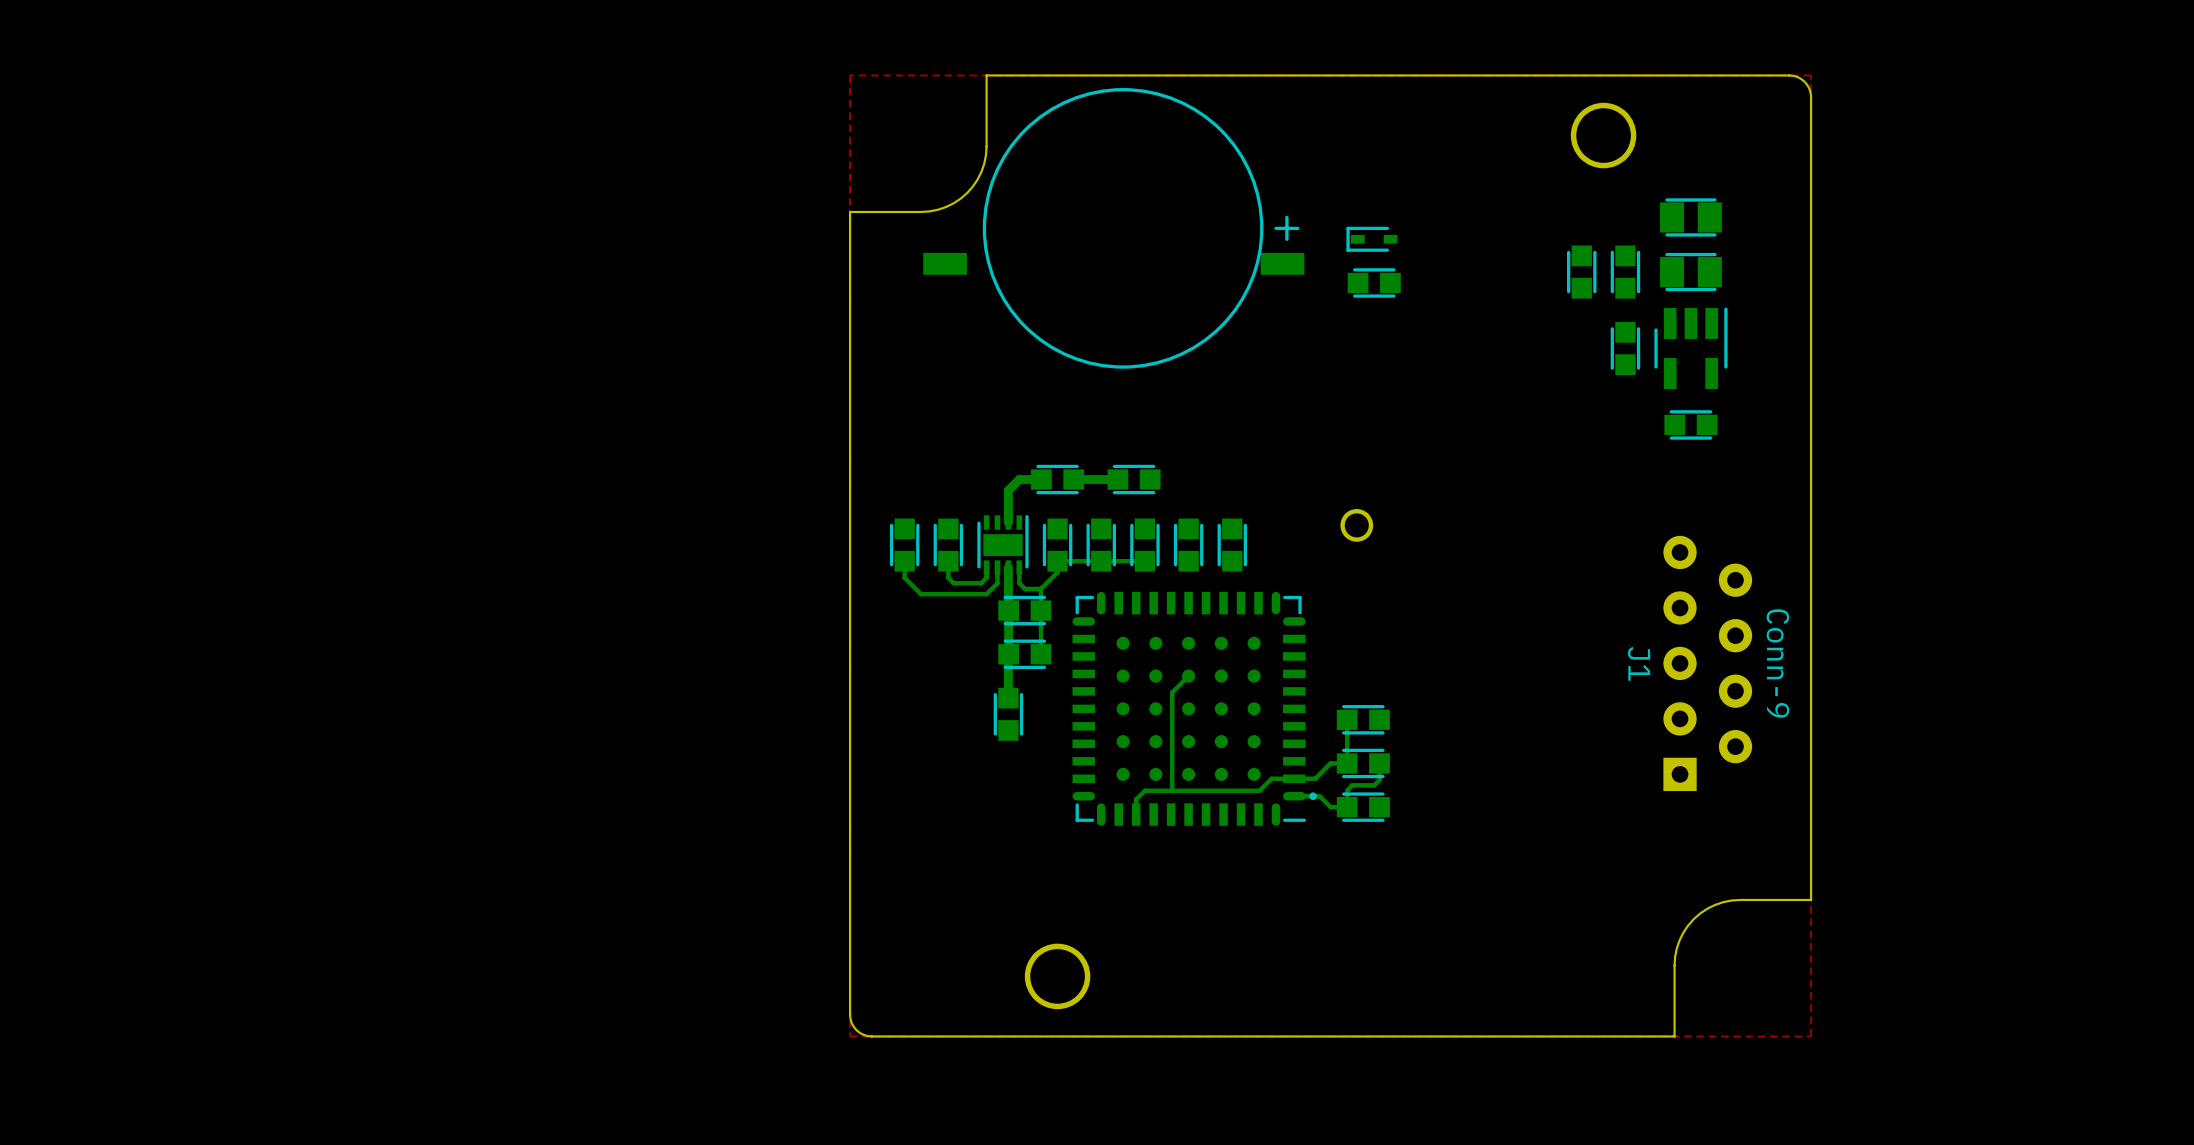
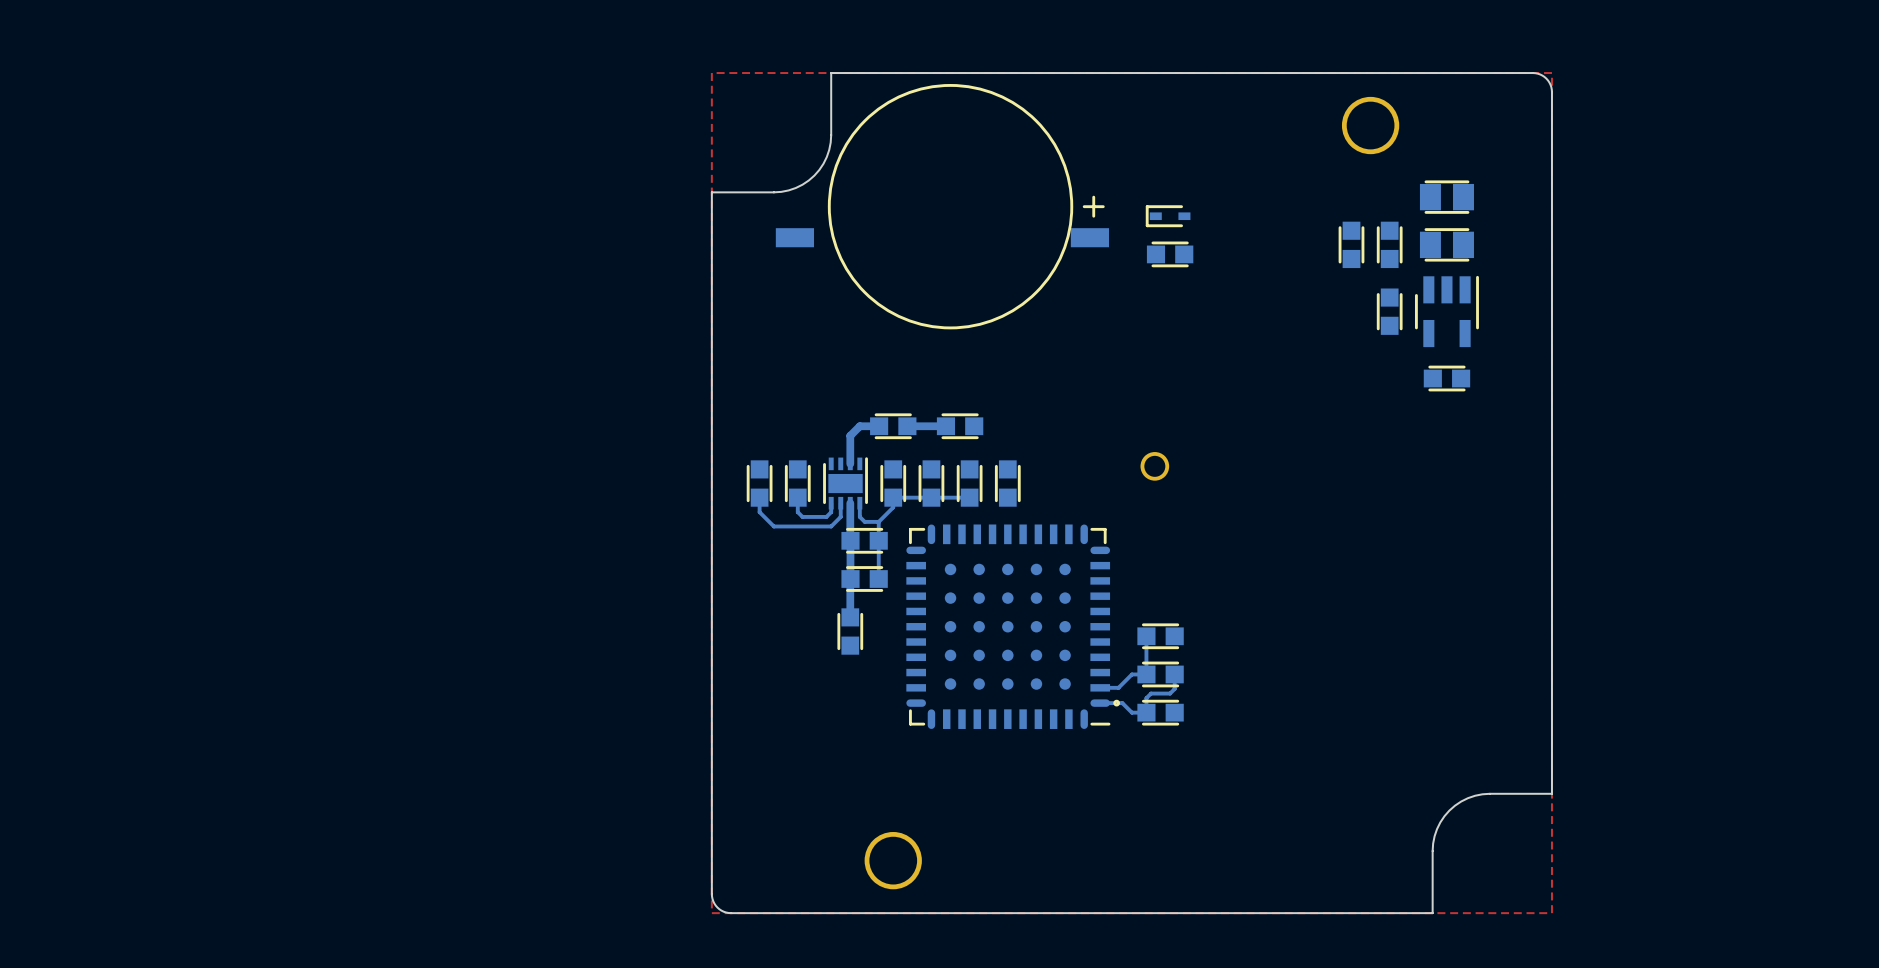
part: (1232, 545) -> none
J1: Conn-9 (1707, 663) -> none
bottom track: (1188, 676) (1172, 692) (1172, 790) -> none
bottom track: (1294, 778) (1271, 778) (1259, 790) (1144, 790) (1136, 799) (1136, 814) -> none

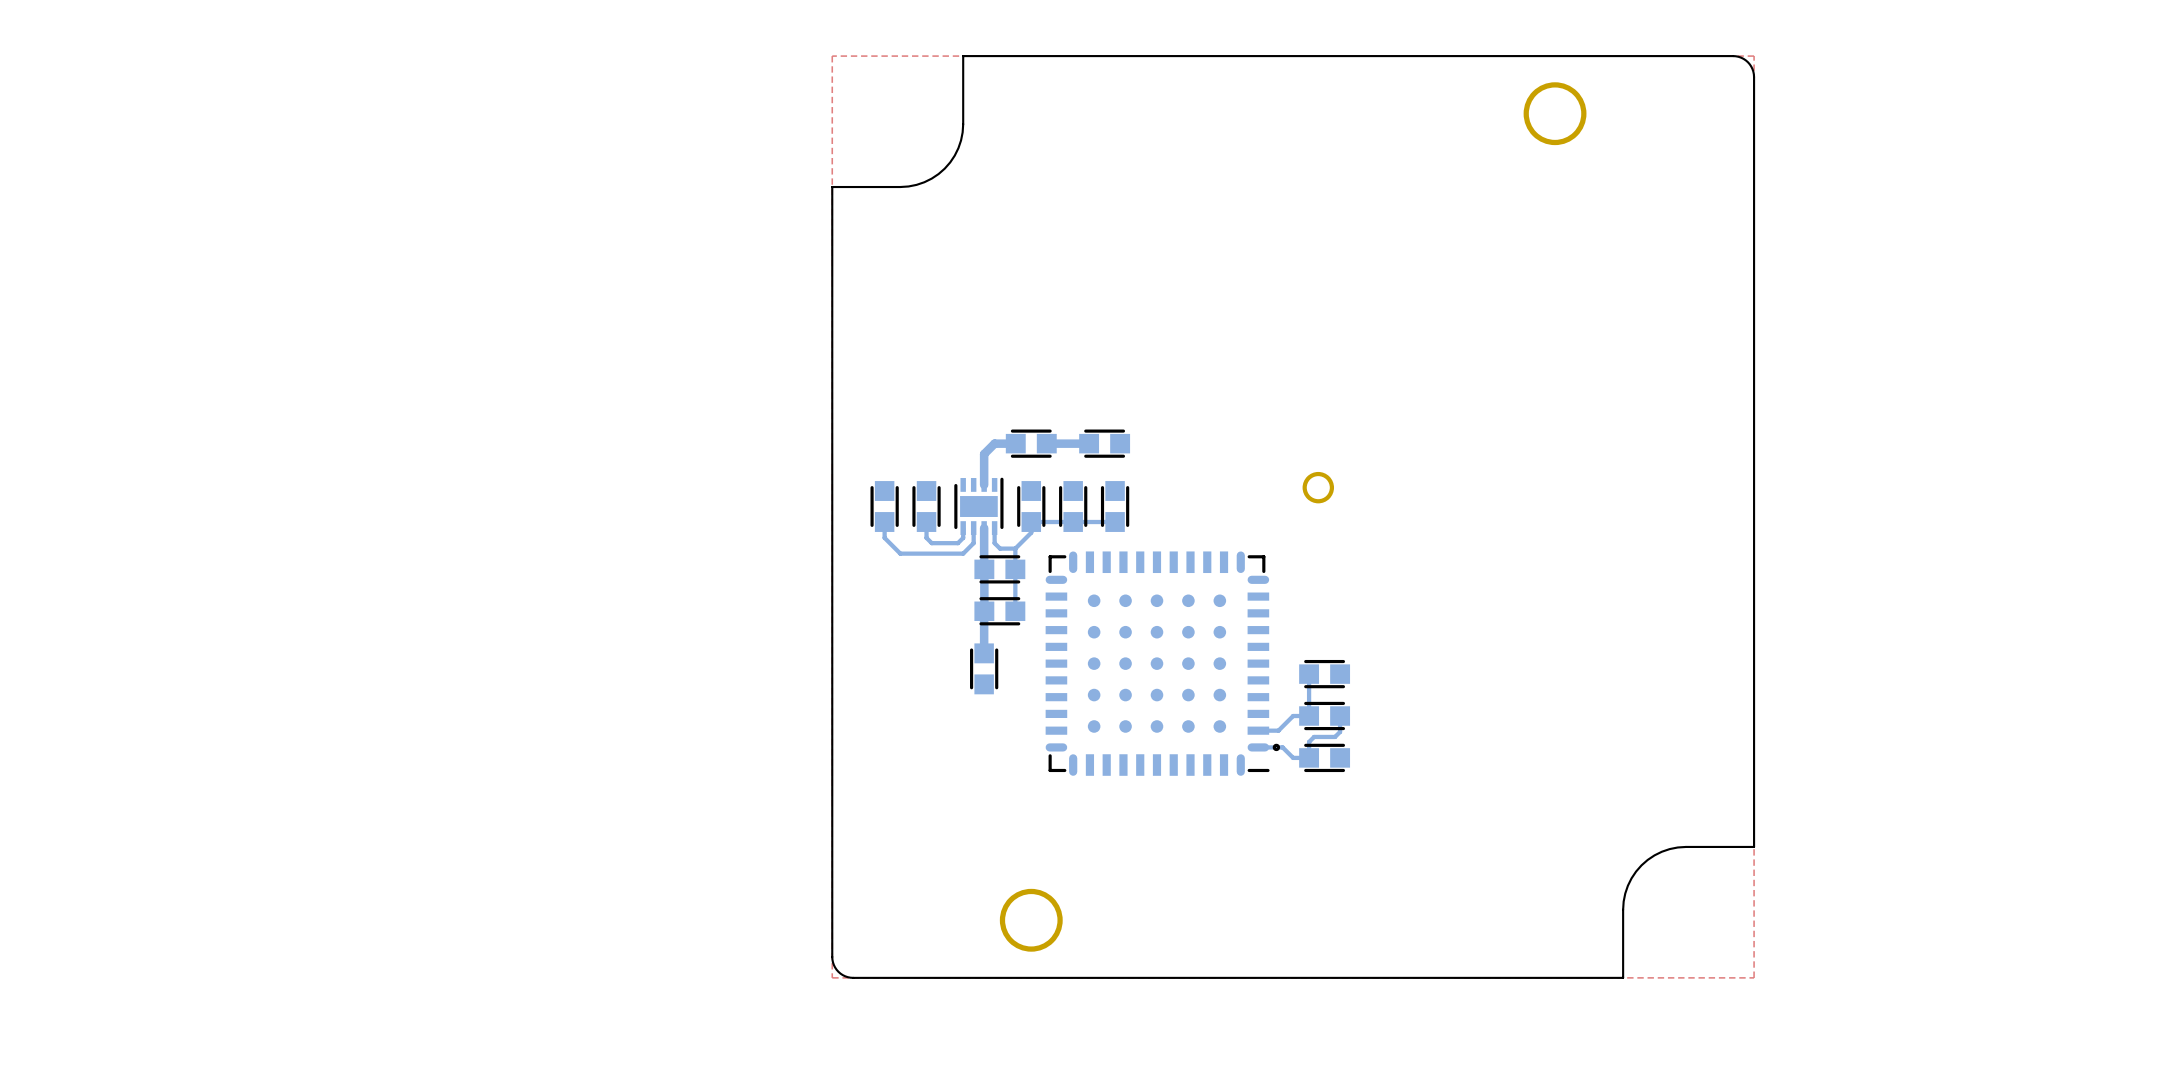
part: (1446, 197) -> none
part: (942, 206) -> none
part: (1168, 216) -> none
part: (1351, 244) -> none
part: (1389, 244) -> none
part: (1446, 244) -> none
part: (1170, 254) -> none
part: (1389, 311) -> none
part: (1446, 311) -> none
part: (1446, 378) -> none
part: (1007, 483) -> none

